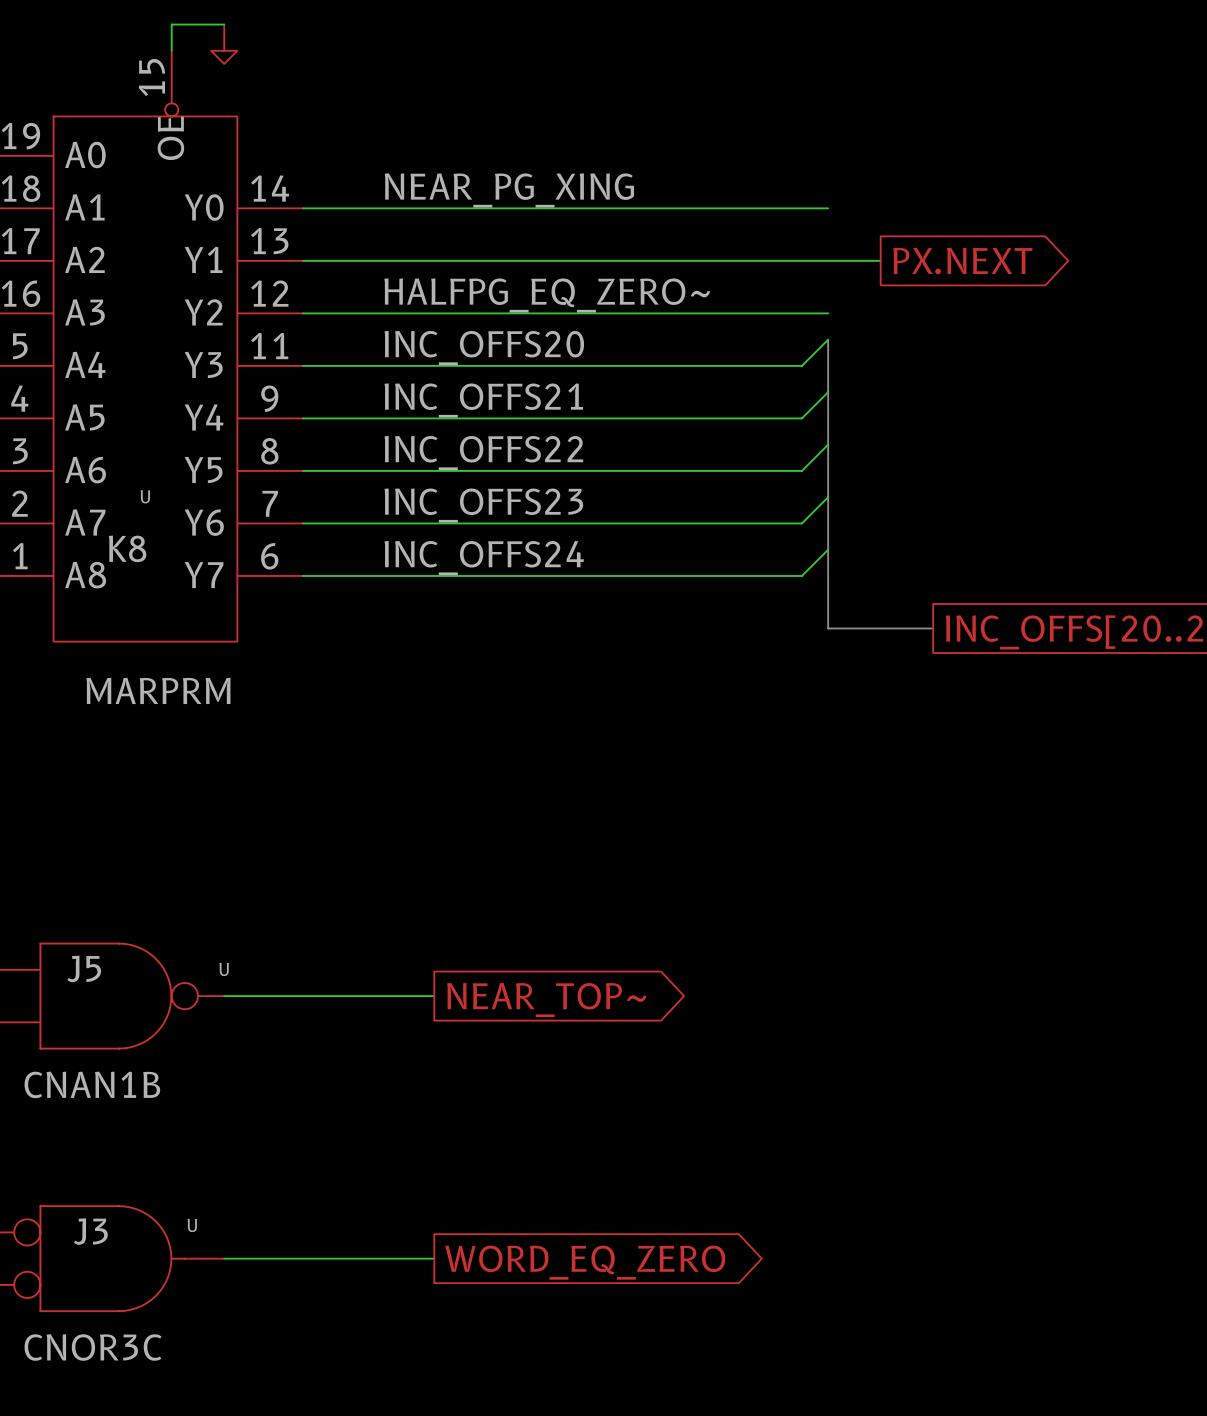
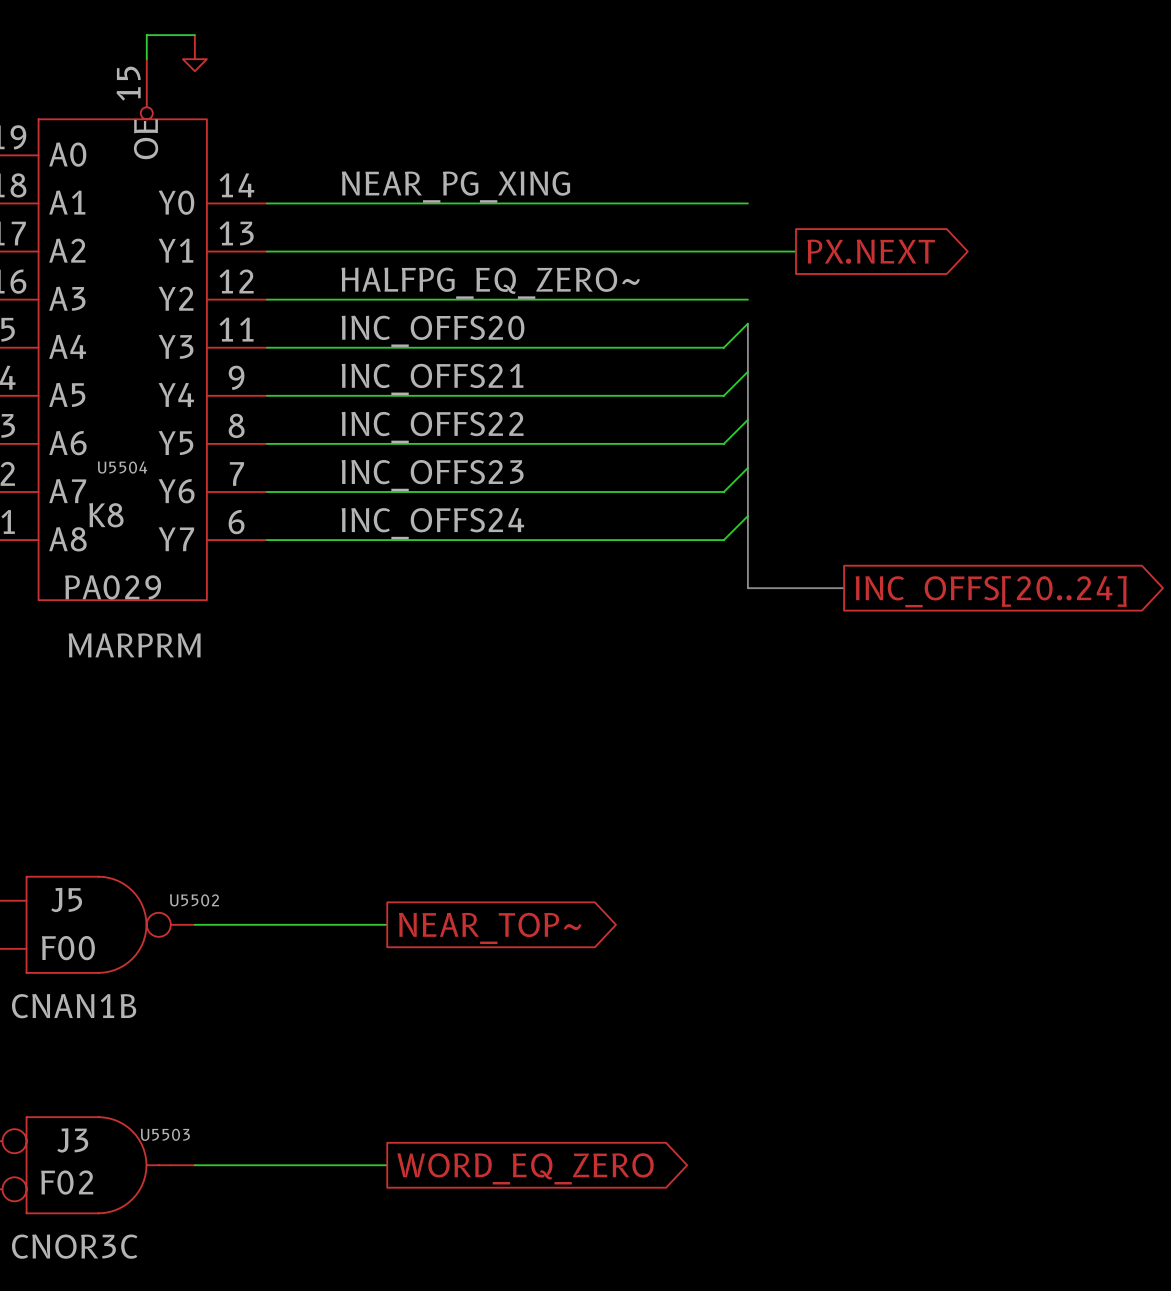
U name: U (145, 496) -> U5504 (122, 467)
U value: none -> PA029 (113, 587)
U name: U (224, 969) -> U5502 (194, 900)
U value: none -> F00 (68, 948)
U name: U (192, 1225) -> U5503 (165, 1134)
U value: none -> F02 (67, 1182)

